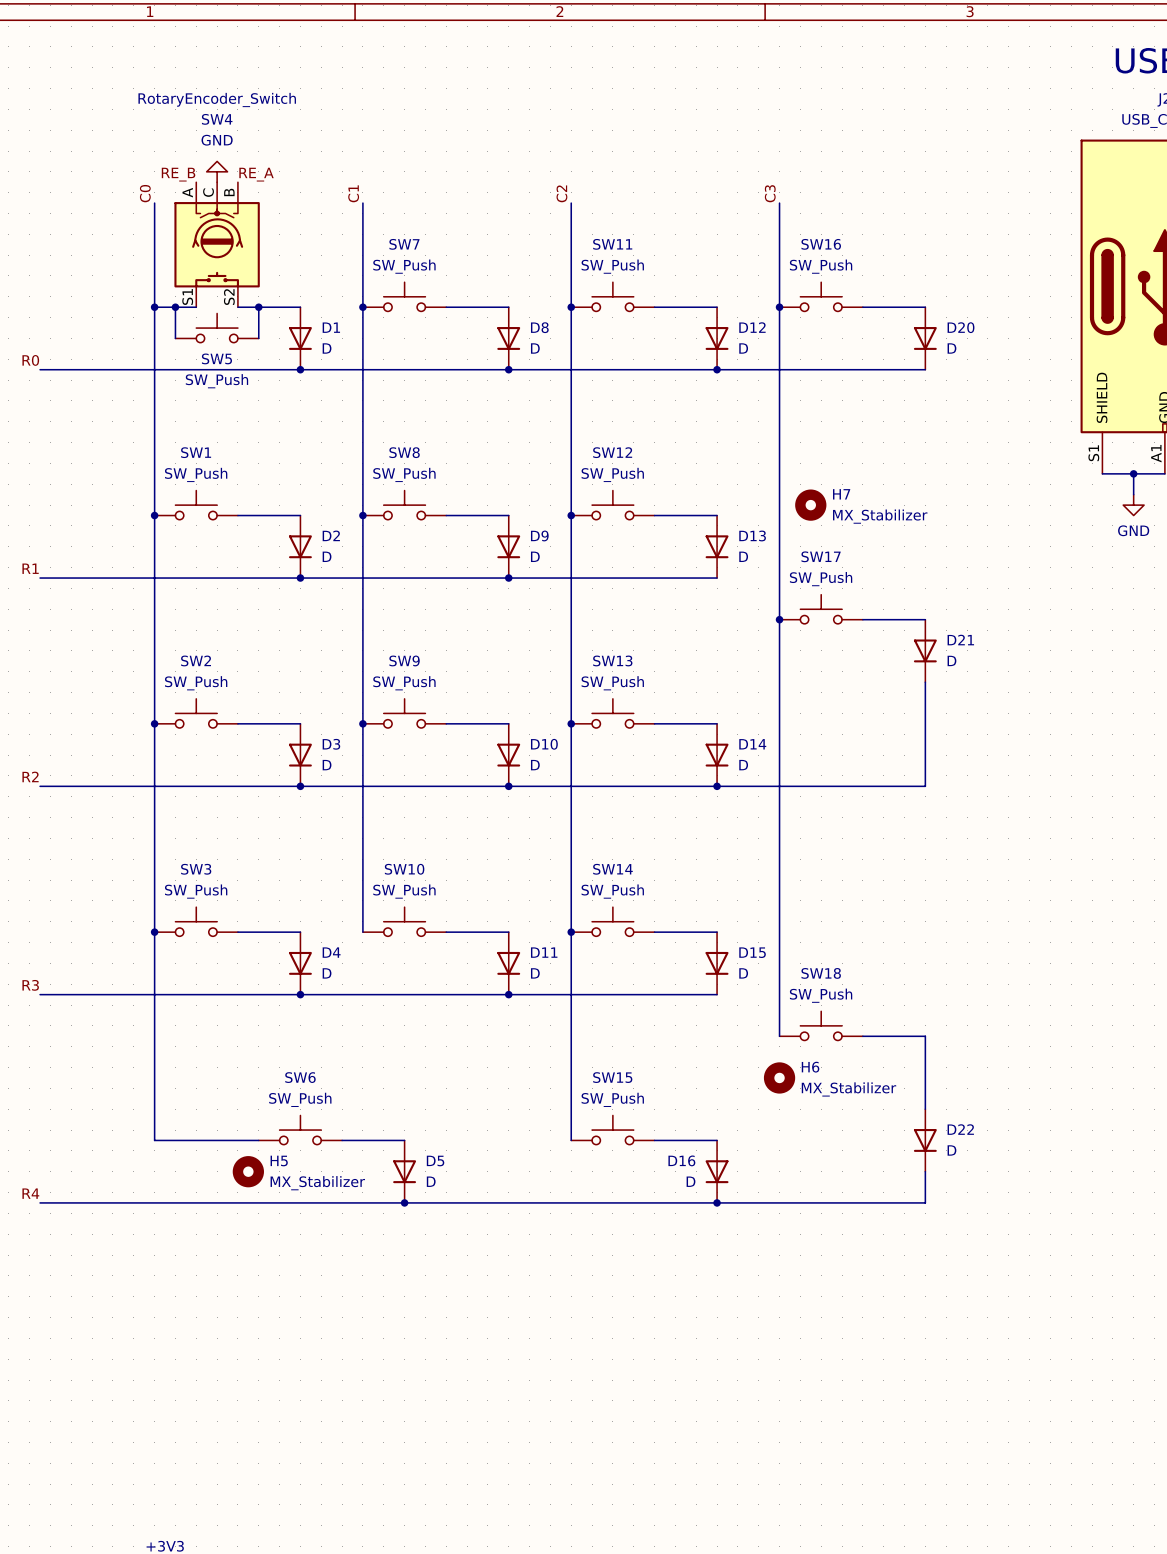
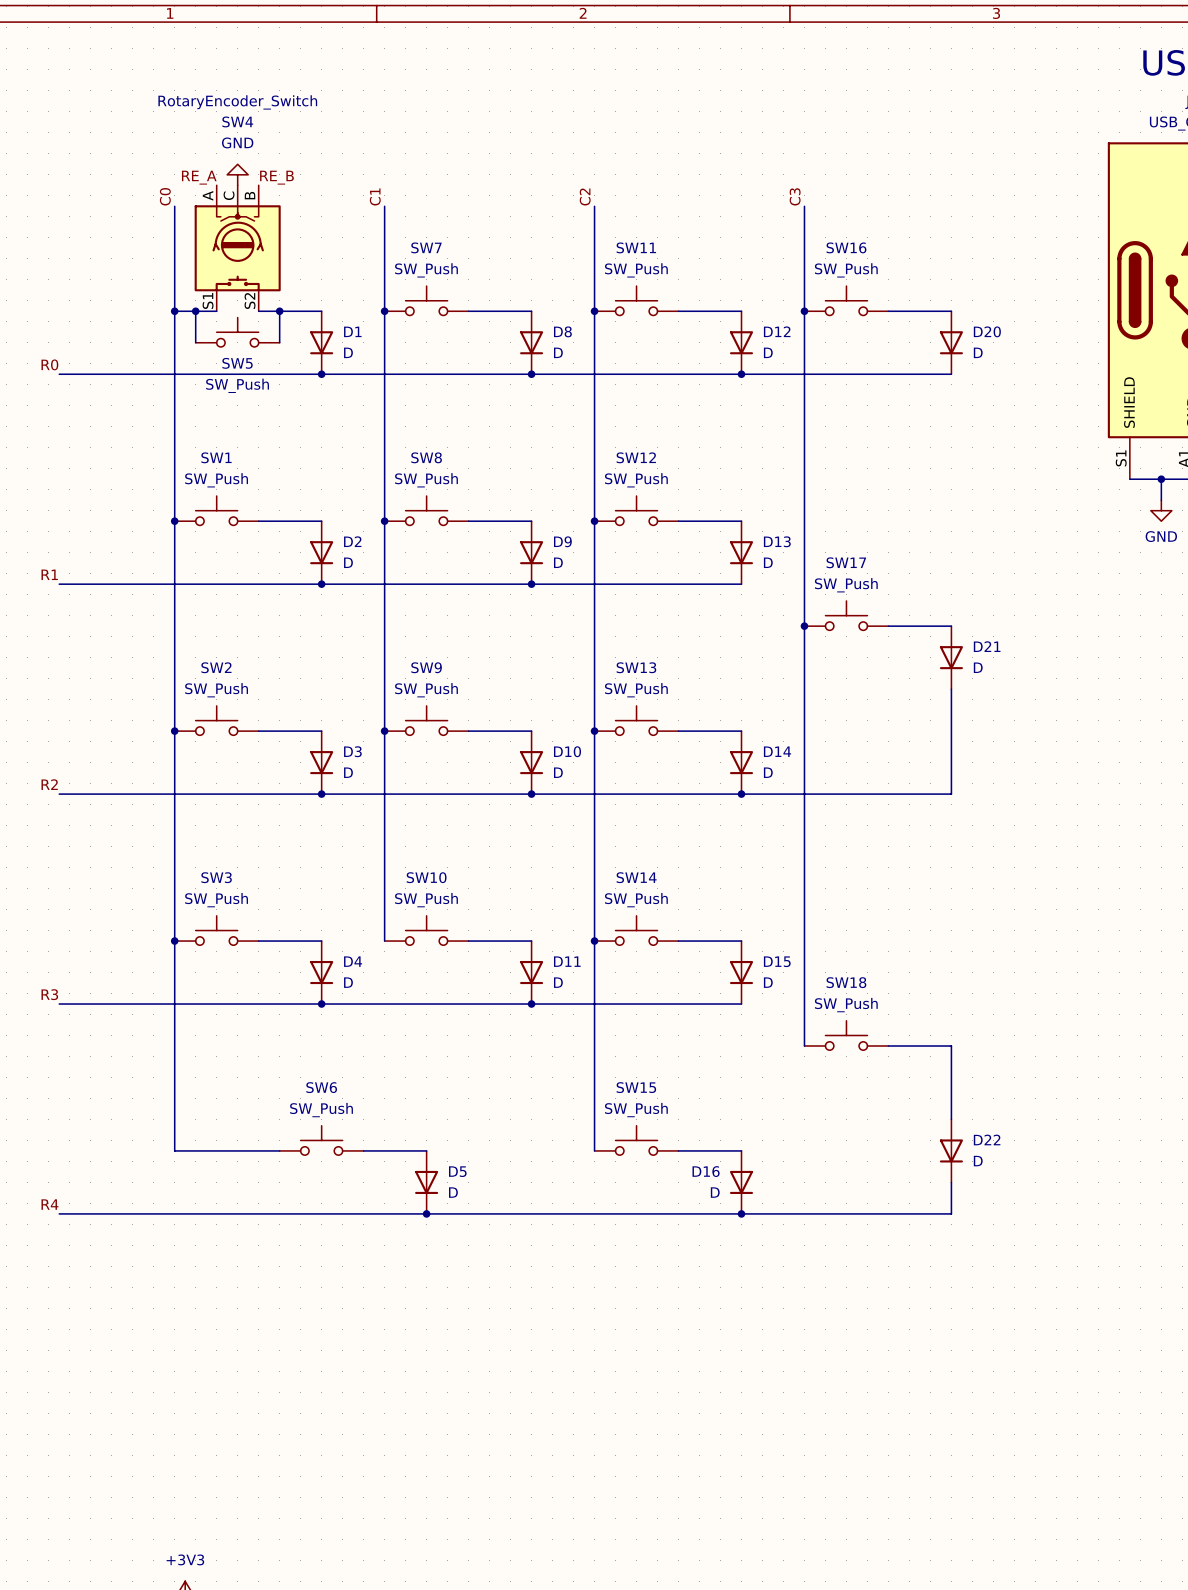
label: RE_B (178, 174) -> RE_A (199, 177)
label: RE_A (256, 174) -> RE_B (276, 177)
H7: MX_Stabilizer (810, 505) -> none
H6: MX_Stabilizer (779, 1077) -> none
H5: MX_Stabilizer (248, 1171) -> none

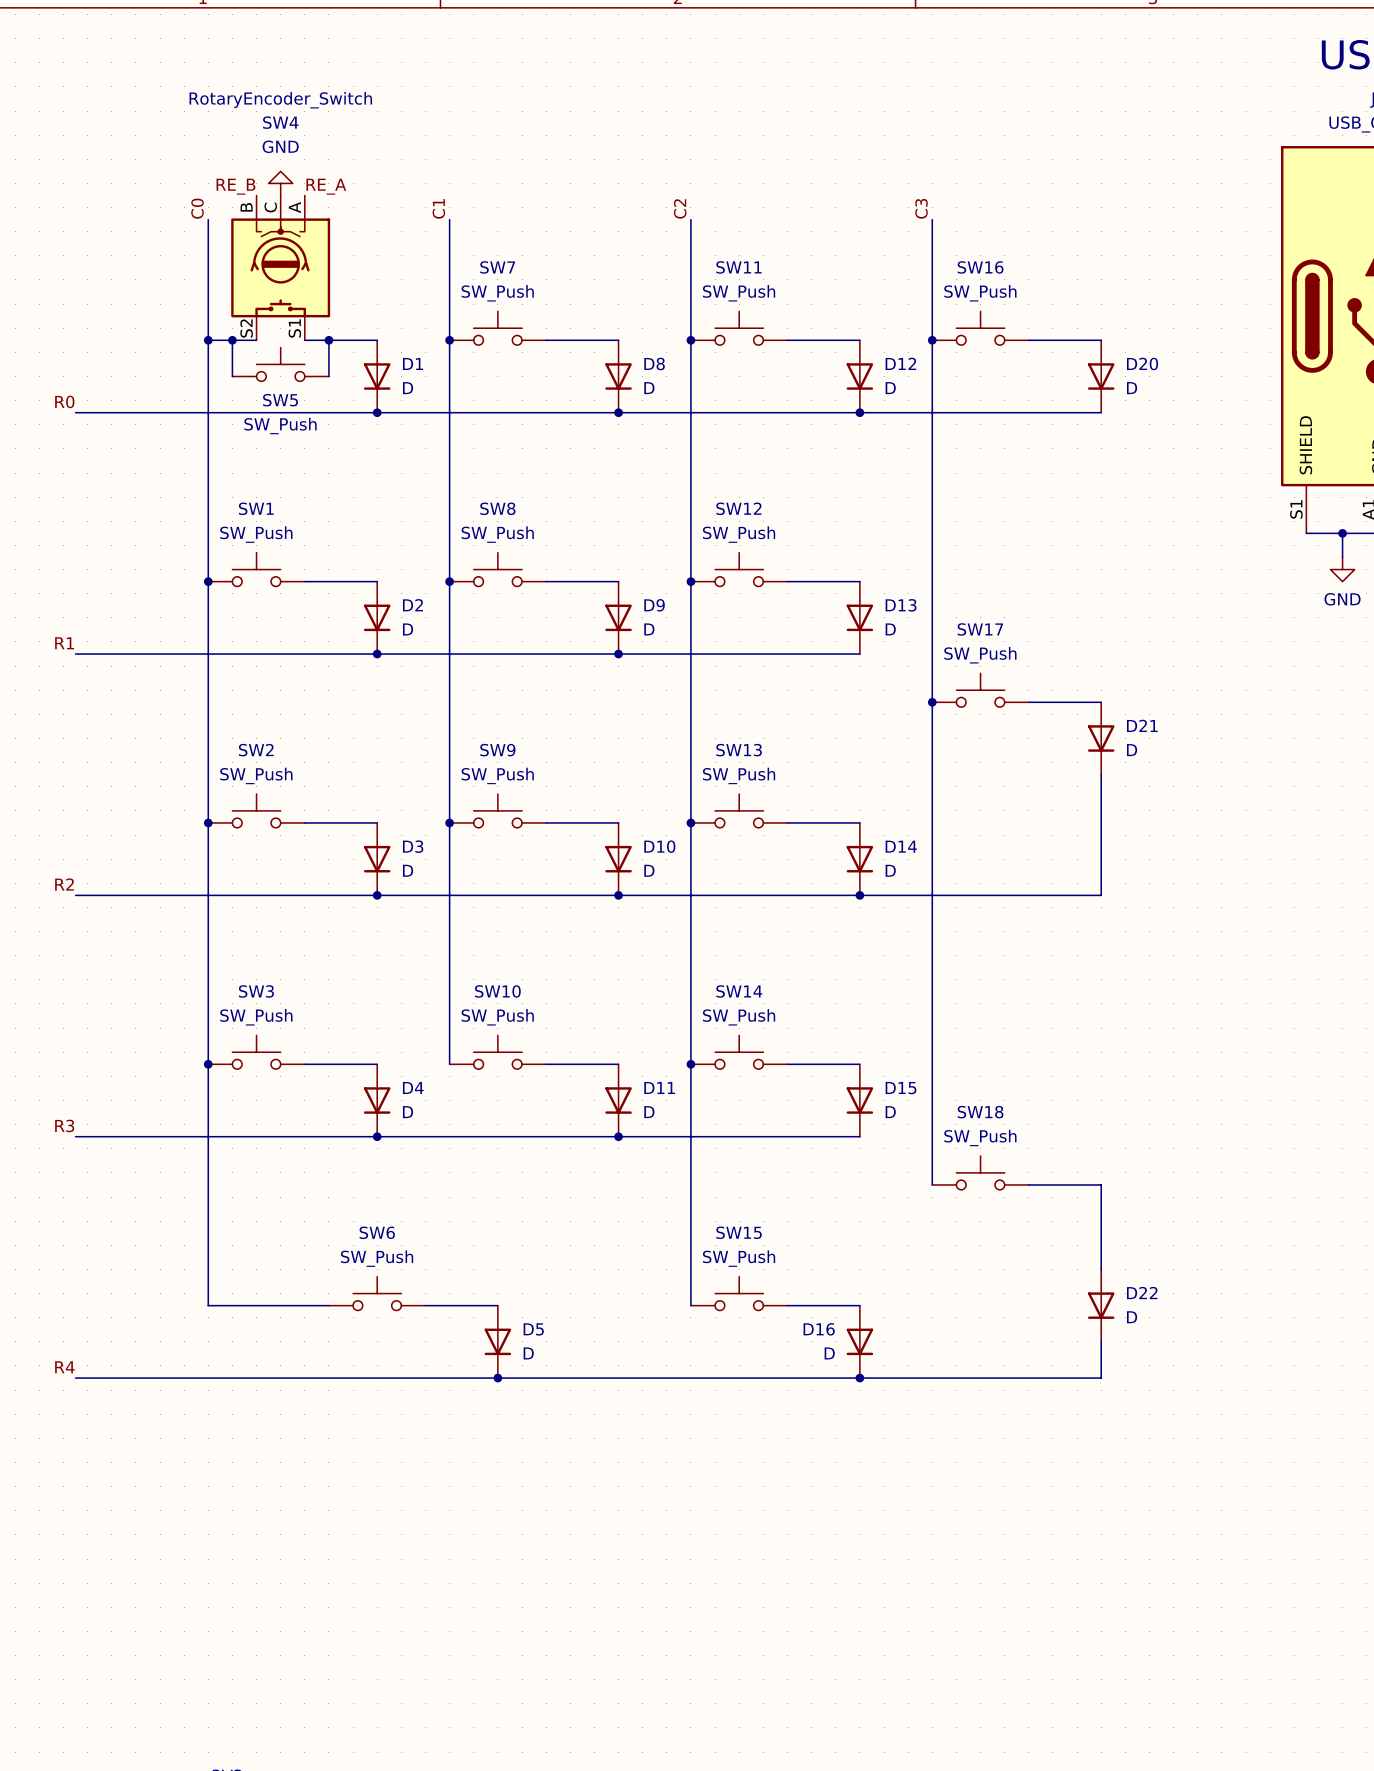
label: RE_A (199, 177) -> RE_B (235, 186)
label: RE_B (276, 177) -> RE_A (326, 186)
SW4 flip: as is (237, 248) -> left-right (280, 267)

